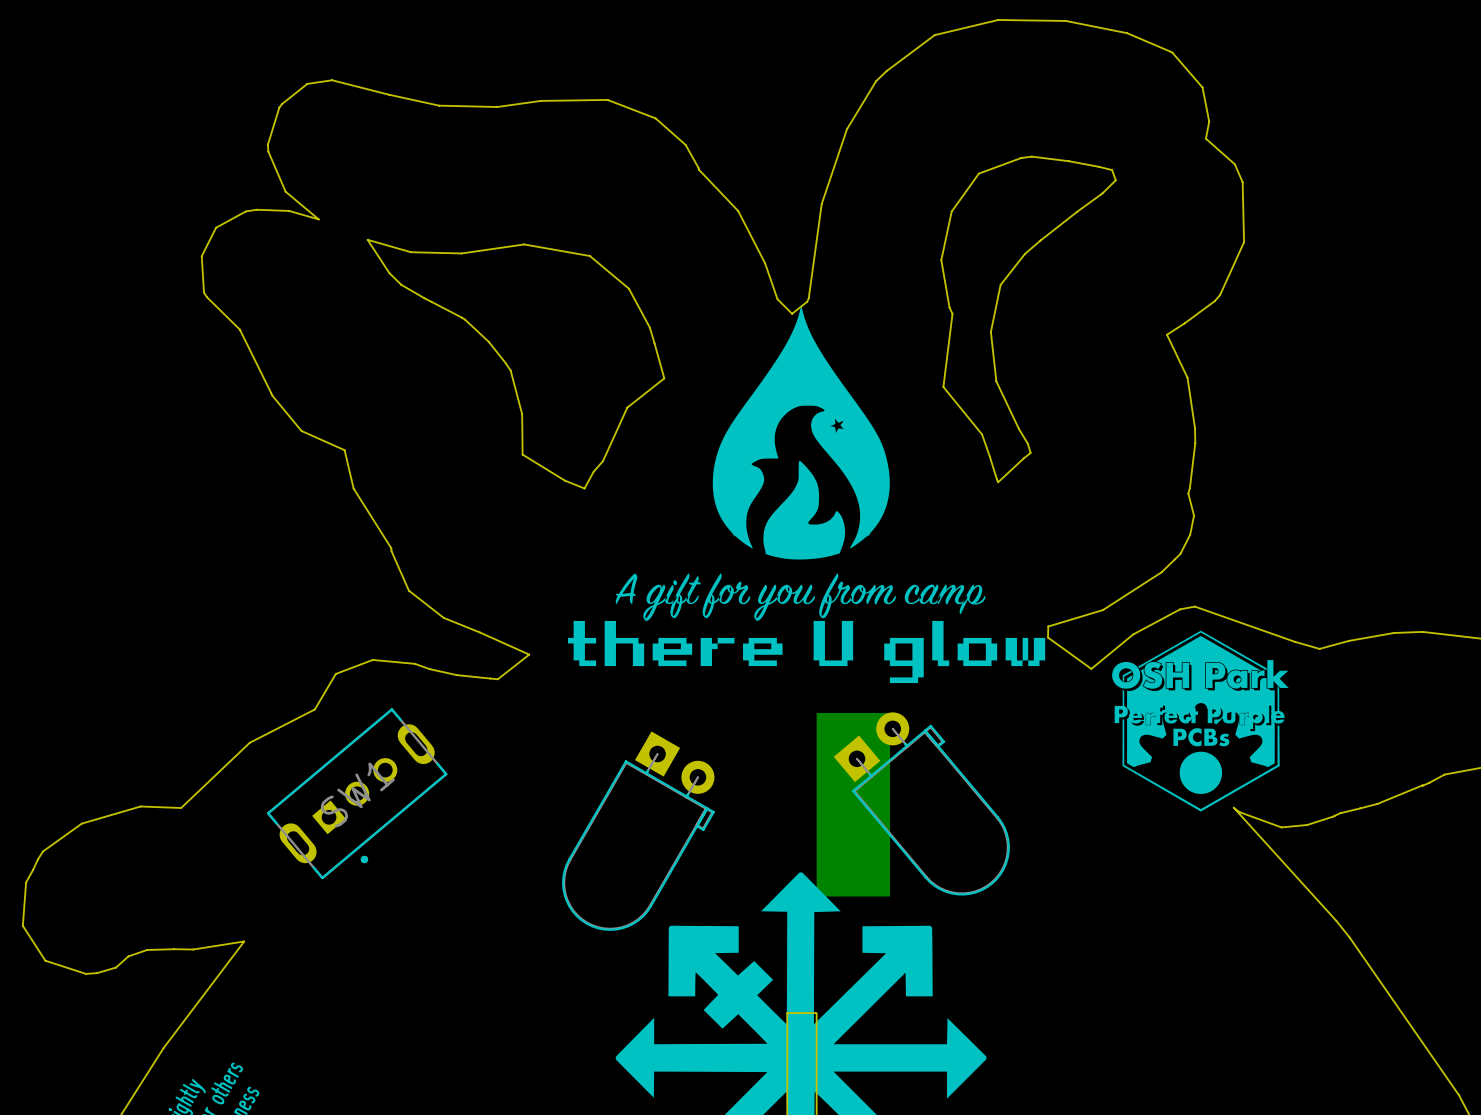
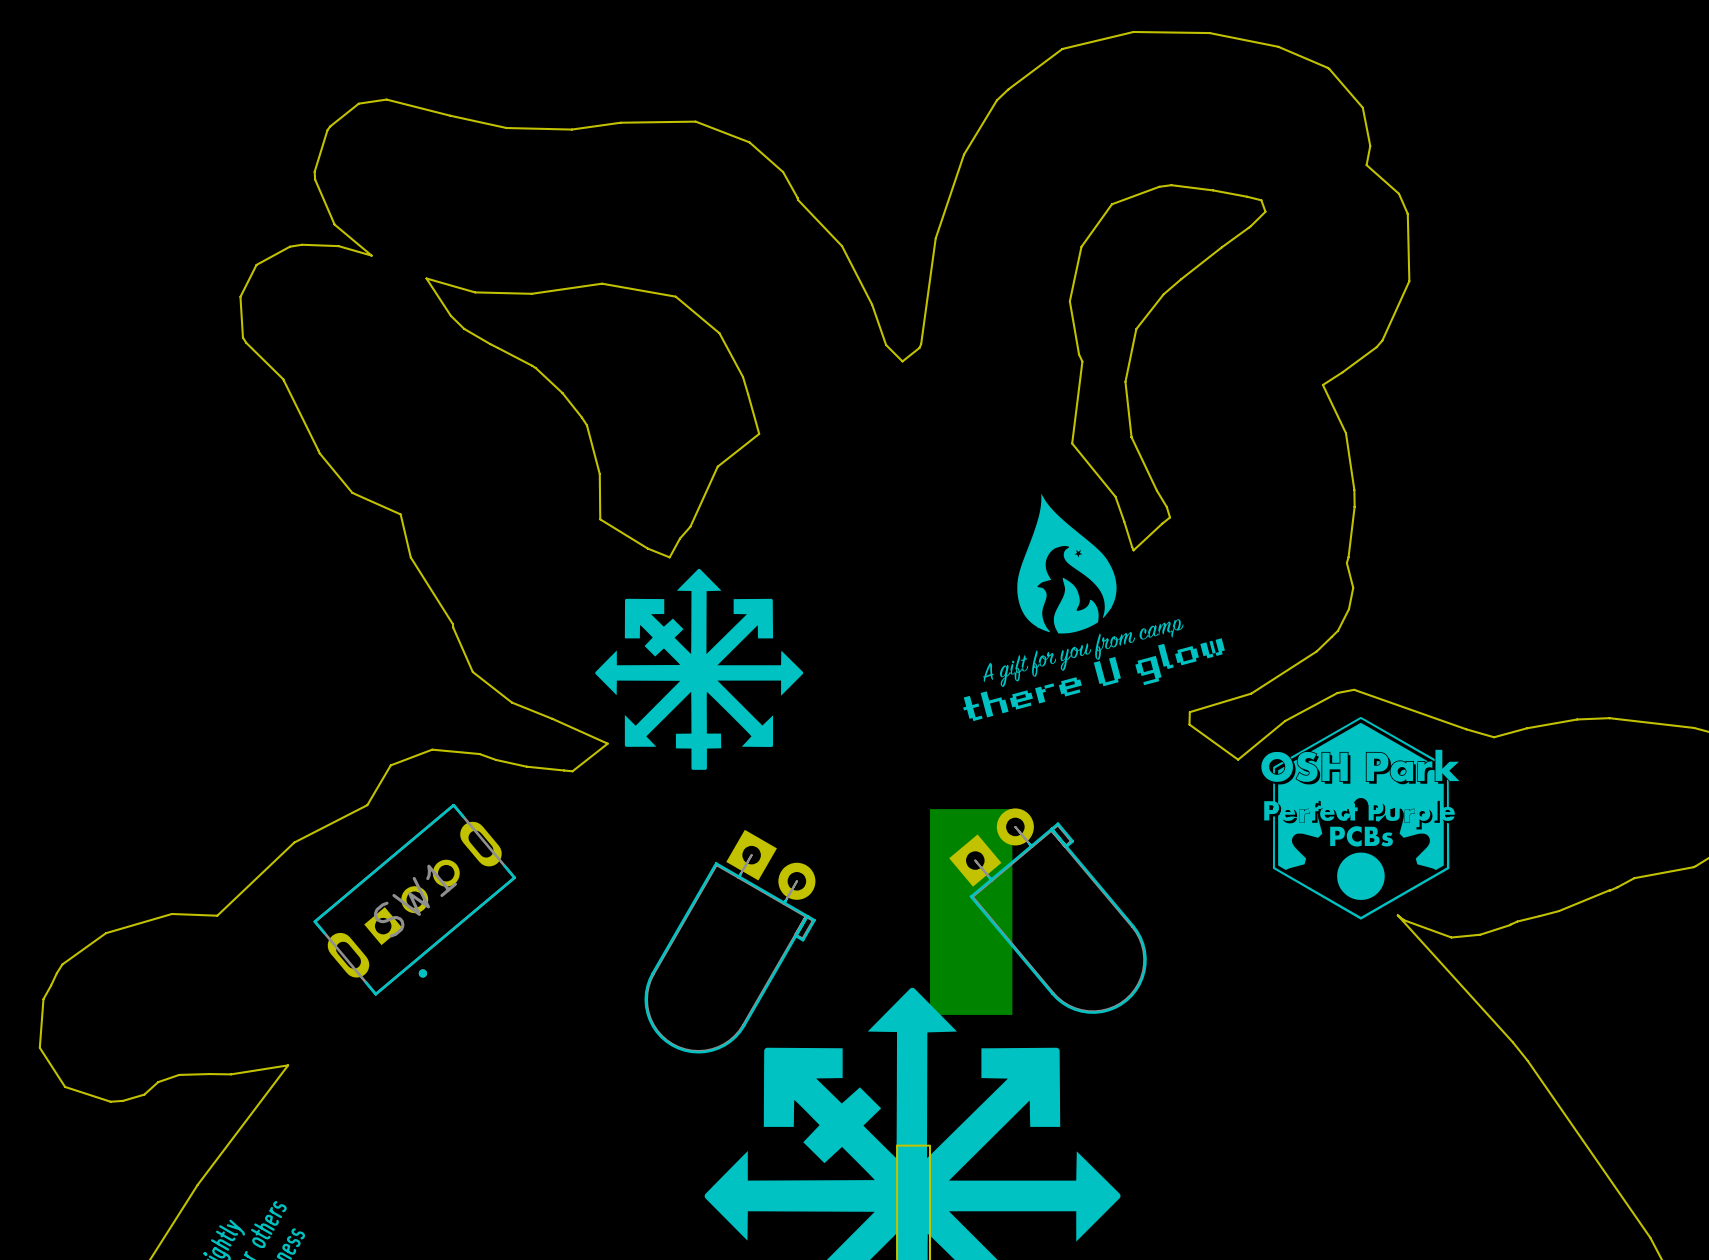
drawing: [567, 305, 890, 667] -> none
drawing: none -> [963, 493, 1225, 722]
drawing shape: [615, 573, 638, 604] -> [595, 568, 804, 770]
drawing shape: [819, 573, 896, 619] -> [982, 662, 994, 682]
drawing: [884, 584, 1046, 684] -> none

